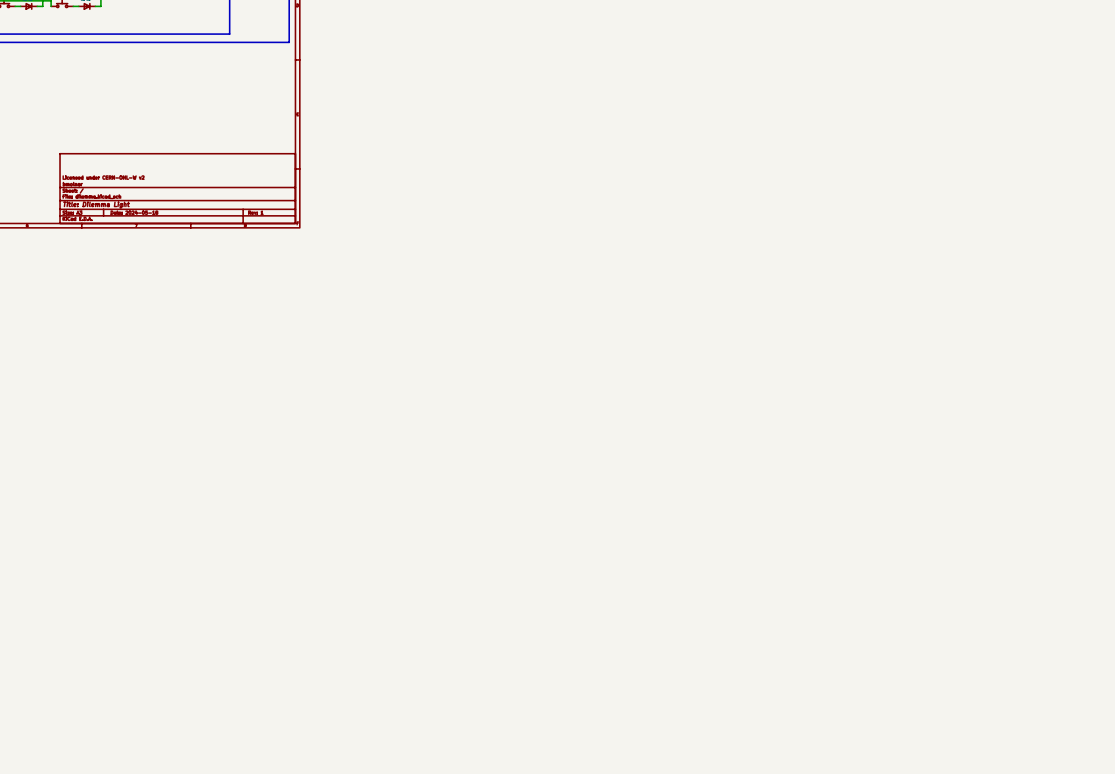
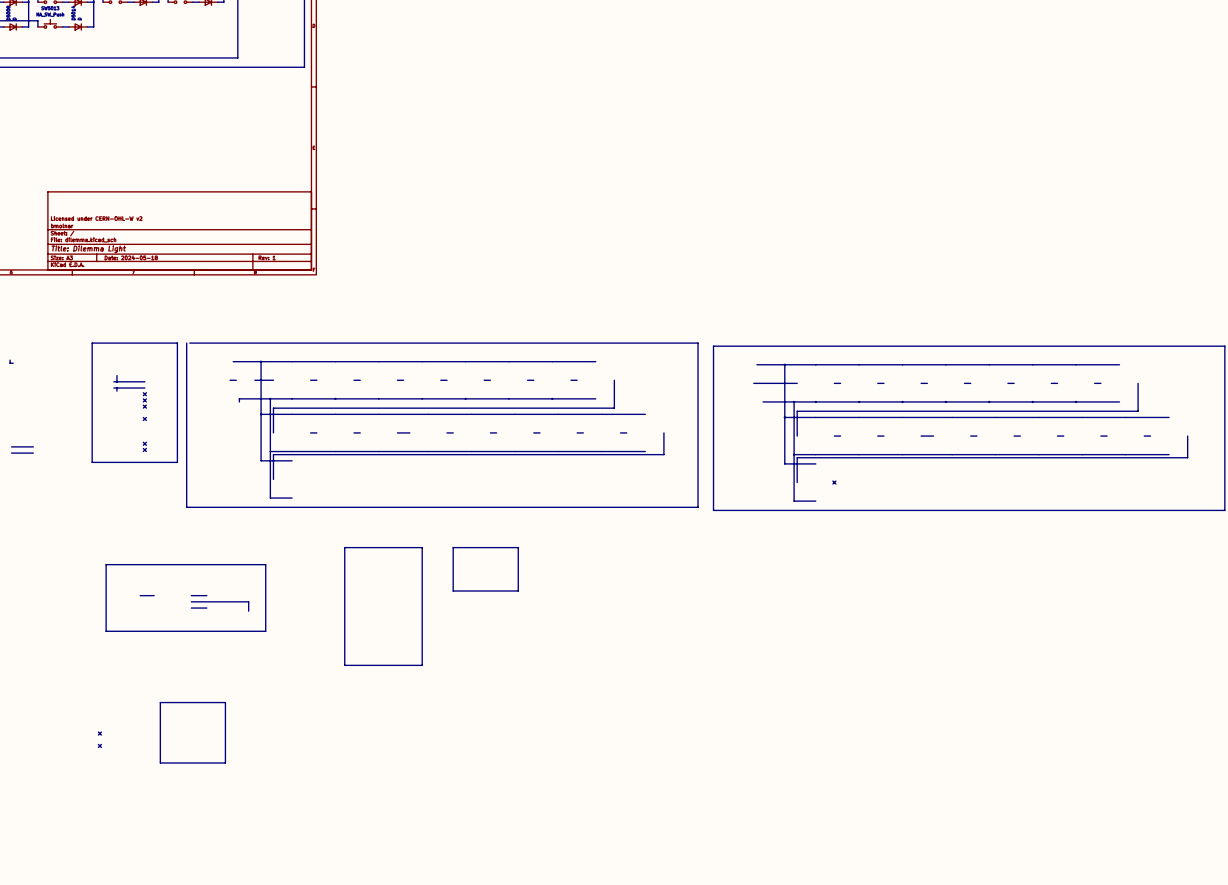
line: none -> (92, 343) (92, 462) (177, 462) (177, 343) (92, 343)
line: none -> (186, 343) (186, 507) (698, 507) (698, 343) (189, 343)
line: none -> (713, 346) (1224, 346) (1224, 510) (713, 510) (713, 346)
wire: none -> (10, 360) (10, 363) (13, 363)
wire: none -> (233, 361) (595, 361)
wire: none -> (261, 361) (261, 460) (292, 460)
wire: none -> (756, 364) (1119, 364)
wire: none -> (784, 364) (784, 463) (815, 463)
wire: none -> (116, 375) (116, 381)
wire: none -> (230, 380) (236, 380)
wire: none -> (254, 380) (273, 380)
wire: none -> (310, 380) (316, 380)
wire: none -> (354, 380) (360, 380)
wire: none -> (397, 380) (403, 380)
wire: none -> (440, 380) (447, 380)
wire: none -> (484, 380) (490, 380)
wire: none -> (527, 380) (533, 380)
wire: none -> (570, 380) (577, 380)
wire: none -> (614, 380) (614, 408) (273, 408) (273, 432)
wire: none -> (113, 381) (144, 381)
wire: none -> (753, 383) (797, 383)
wire: none -> (834, 383) (840, 383)
wire: none -> (877, 383) (883, 383)
wire: none -> (921, 383) (927, 383)
wire: none -> (964, 383) (970, 383)
wire: none -> (1007, 383) (1014, 383)
wire: none -> (1051, 383) (1057, 383)
wire: none -> (1094, 383) (1100, 383)
wire: none -> (1138, 383) (1138, 411) (797, 411) (797, 436)
wire: none -> (113, 388) (144, 388)
wire: none -> (116, 388) (116, 391)
no-connect mark: none -> (144, 394)
wire: none -> (270, 398) (270, 498) (292, 498)
wire: none -> (595, 398) (239, 398) (239, 401)
no-connect mark: none -> (144, 400)
wire: none -> (763, 401) (1119, 401)
wire: none -> (794, 401) (794, 501) (815, 501)
no-connect mark: none -> (144, 406)
wire: none -> (261, 414) (645, 414)
wire: none -> (784, 417) (1169, 417)
no-connect mark: none -> (144, 419)
wire: none -> (310, 432) (316, 432)
wire: none -> (354, 432) (360, 432)
wire: none -> (397, 432) (409, 432)
wire: none -> (447, 432) (453, 432)
wire: none -> (490, 432) (496, 432)
wire: none -> (533, 432) (539, 432)
wire: none -> (577, 432) (583, 432)
wire: none -> (620, 432) (626, 432)
wire: none -> (663, 432) (663, 454) (273, 454) (273, 479)
wire: none -> (834, 436) (840, 436)
wire: none -> (877, 436) (883, 436)
wire: none -> (921, 436) (933, 436)
wire: none -> (970, 436) (976, 436)
wire: none -> (1014, 436) (1020, 436)
wire: none -> (1057, 436) (1063, 436)
wire: none -> (1100, 436) (1107, 436)
wire: none -> (1144, 436) (1150, 436)
wire: none -> (1187, 436) (1187, 457) (797, 457) (797, 482)
no-connect mark: none -> (144, 443)
wire: none -> (11, 446) (33, 446)
no-connect mark: none -> (144, 449)
wire: none -> (270, 451) (645, 451)
wire: none -> (11, 453) (33, 453)
wire: none -> (794, 454) (1169, 454)
no-connect mark: none -> (834, 482)
line: none -> (344, 547) (344, 665) (422, 665) (422, 547) (344, 547)
line: none -> (453, 547) (518, 547) (518, 590) (453, 590) (453, 547)
line: none -> (106, 564) (106, 631) (265, 631) (265, 564) (106, 564)
wire: none -> (140, 595) (154, 595)
wire: none -> (191, 595) (206, 595)
wire: none -> (191, 601) (248, 601) (248, 611)
wire: none -> (191, 608) (206, 608)
line: none -> (160, 702) (160, 762) (225, 762) (225, 702) (160, 702)
no-connect mark: none -> (99, 733)
no-connect mark: none -> (99, 745)

